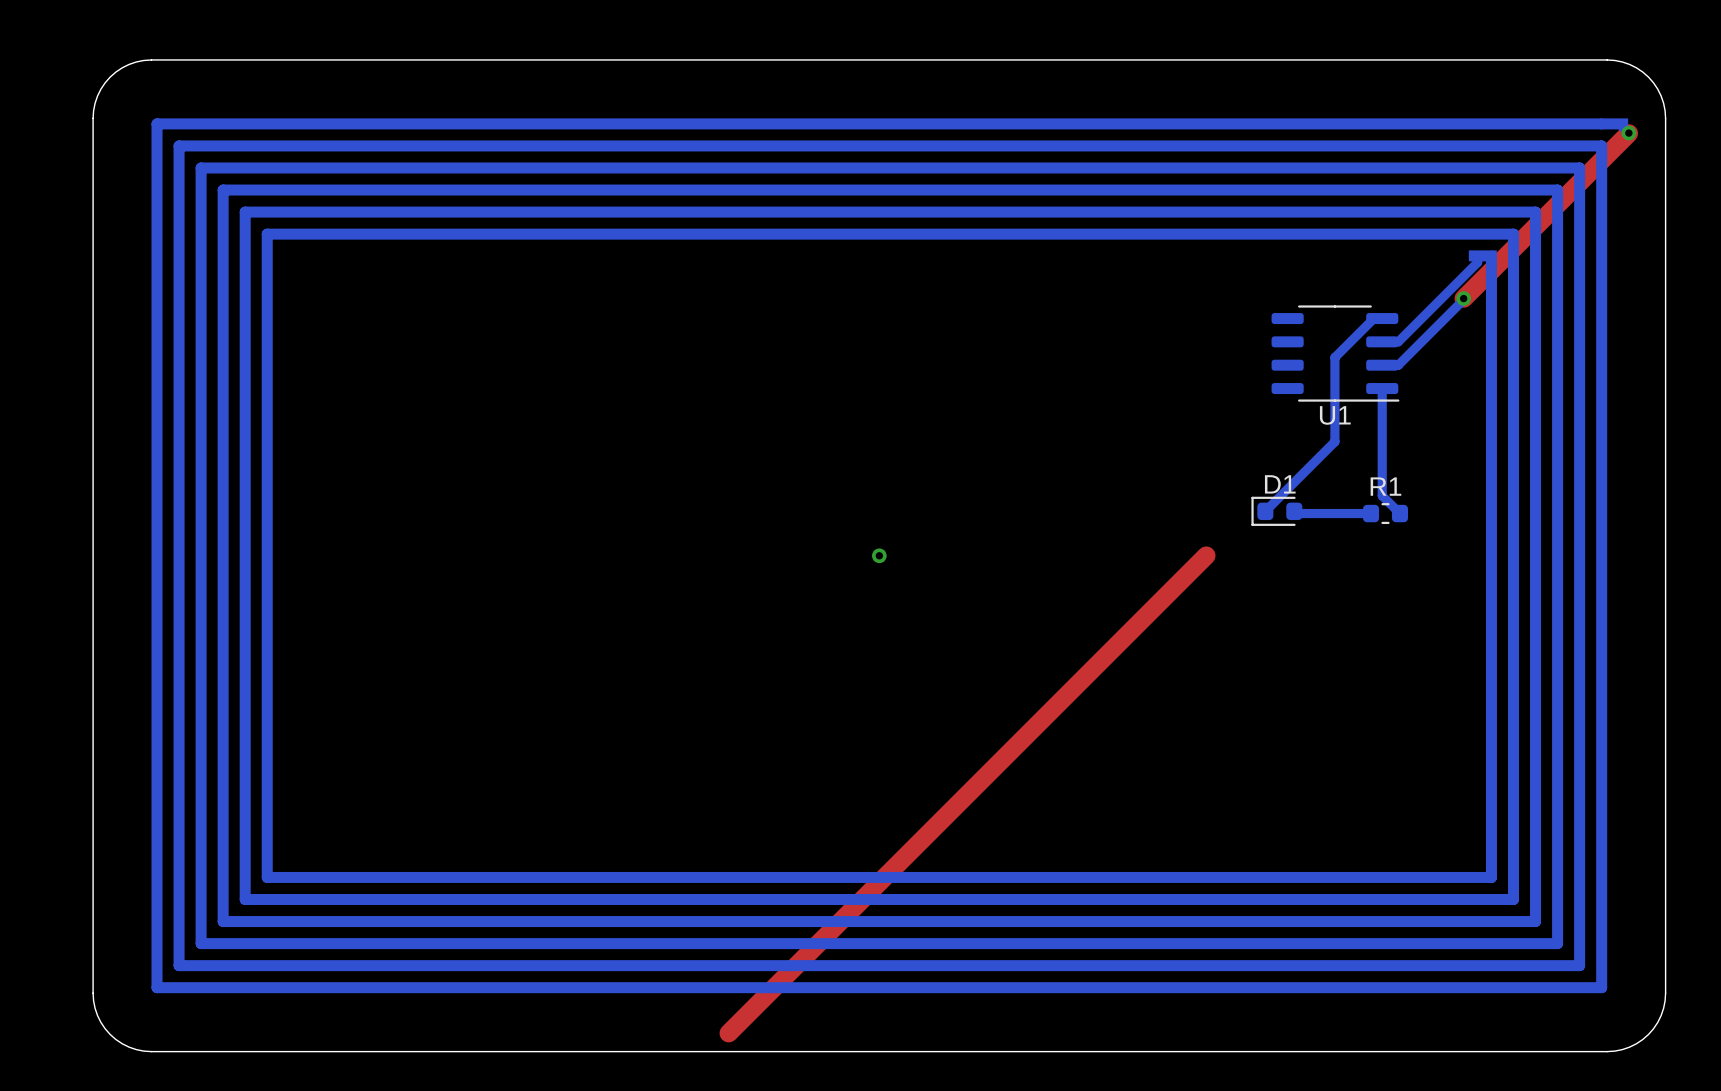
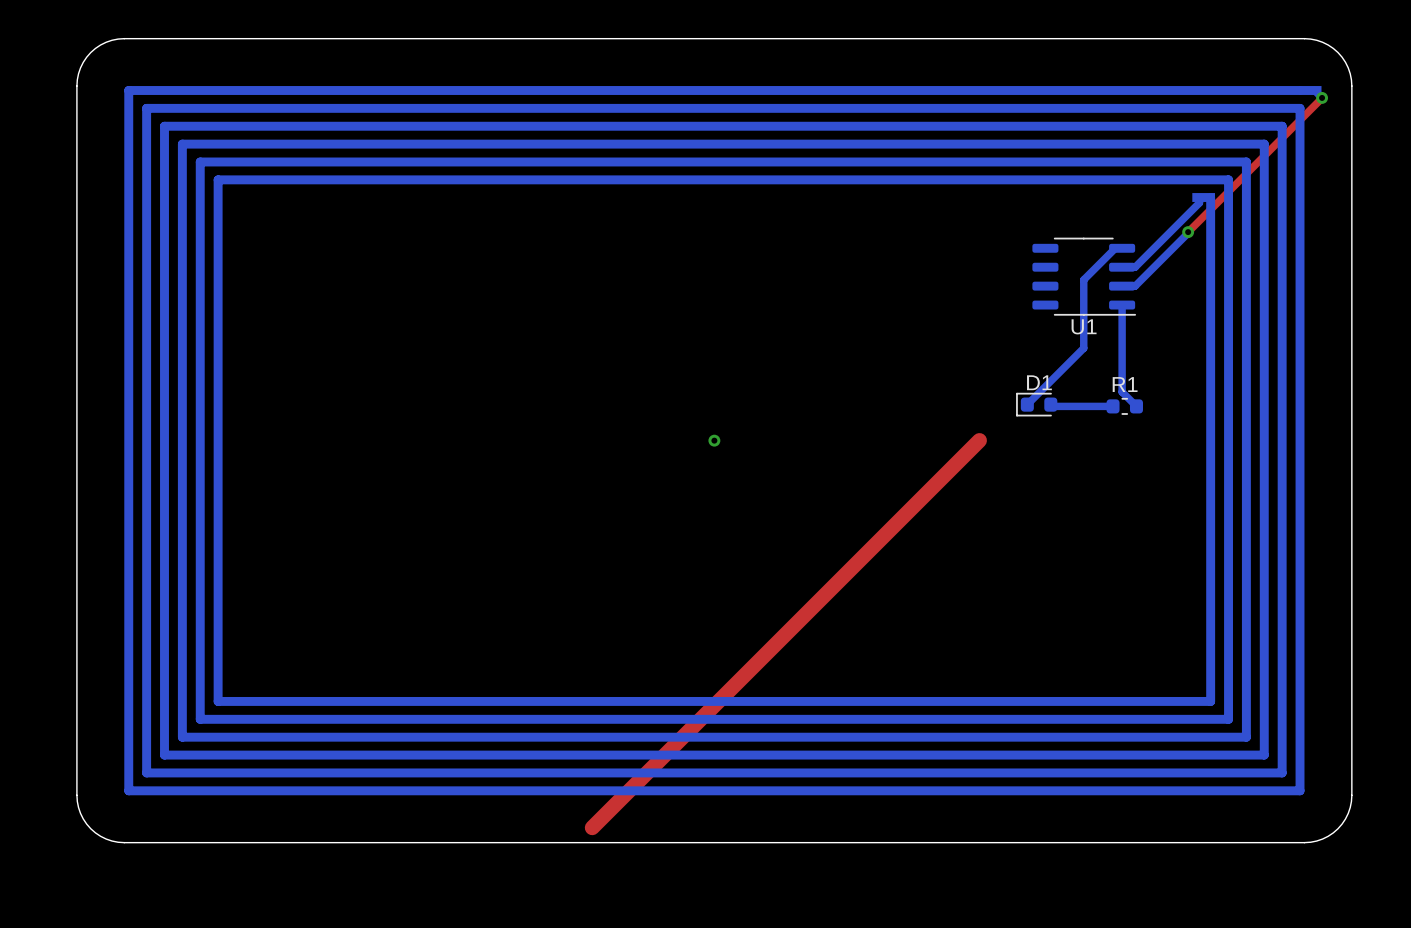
top track width: thick (1628, 133) (1463, 298) -> thin (1322, 98) (1188, 232)

